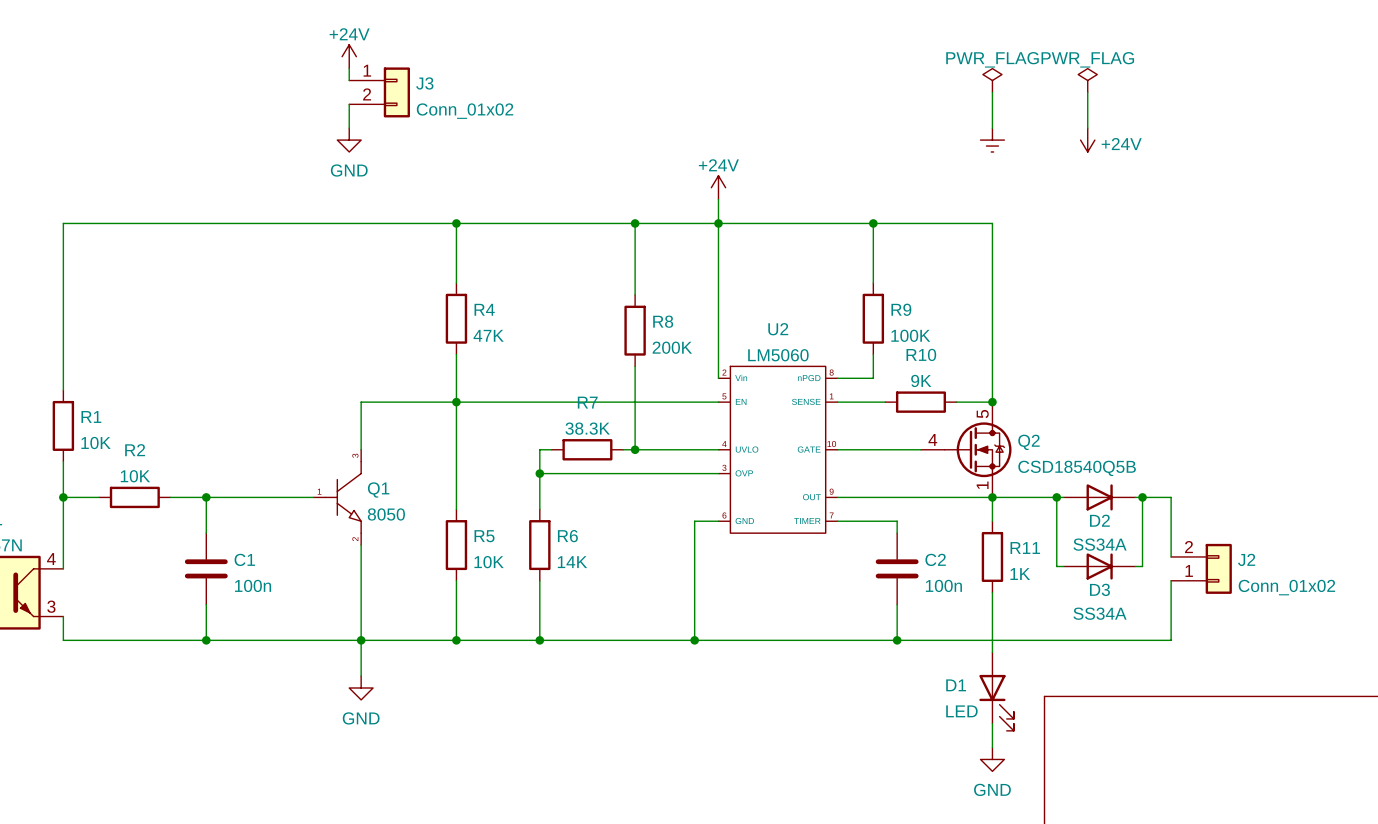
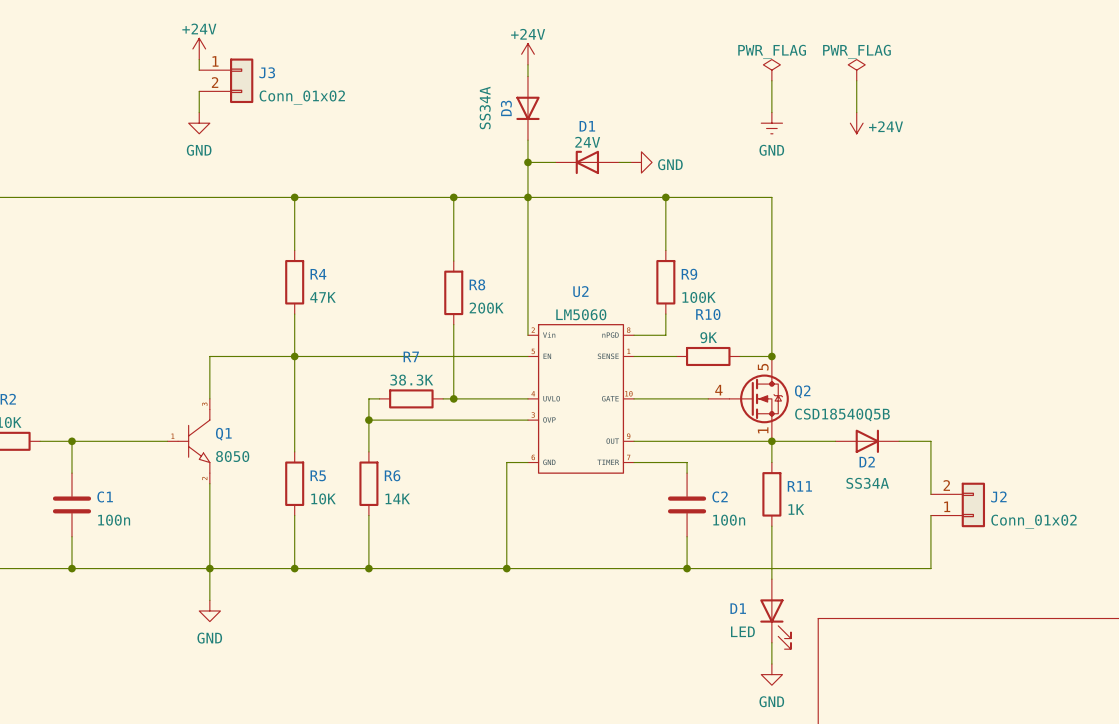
wire: none -> (527, 64) (527, 76)
power symbol text: none -> GND (771, 150)
wire: none -> (527, 162) (555, 162)
junction: none -> (527, 162)
D1: none -> 24V (587, 162)
wire: none -> (619, 162) (630, 162)
power symbol: none -> GND (641, 162)
power symbol position: +24V (718, 187) -> +24V (527, 54)
wire: (1056, 497) (1056, 566) (1063, 566) -> none
junction: (1056, 497) -> none
wire: (1142, 497) (1142, 566) (1135, 566) -> none
junction: (1142, 497) -> none
D3 rotation: 0° (1099, 566) -> 90° clockwise (527, 108)
D3 position: (1099, 566) -> (527, 108)

